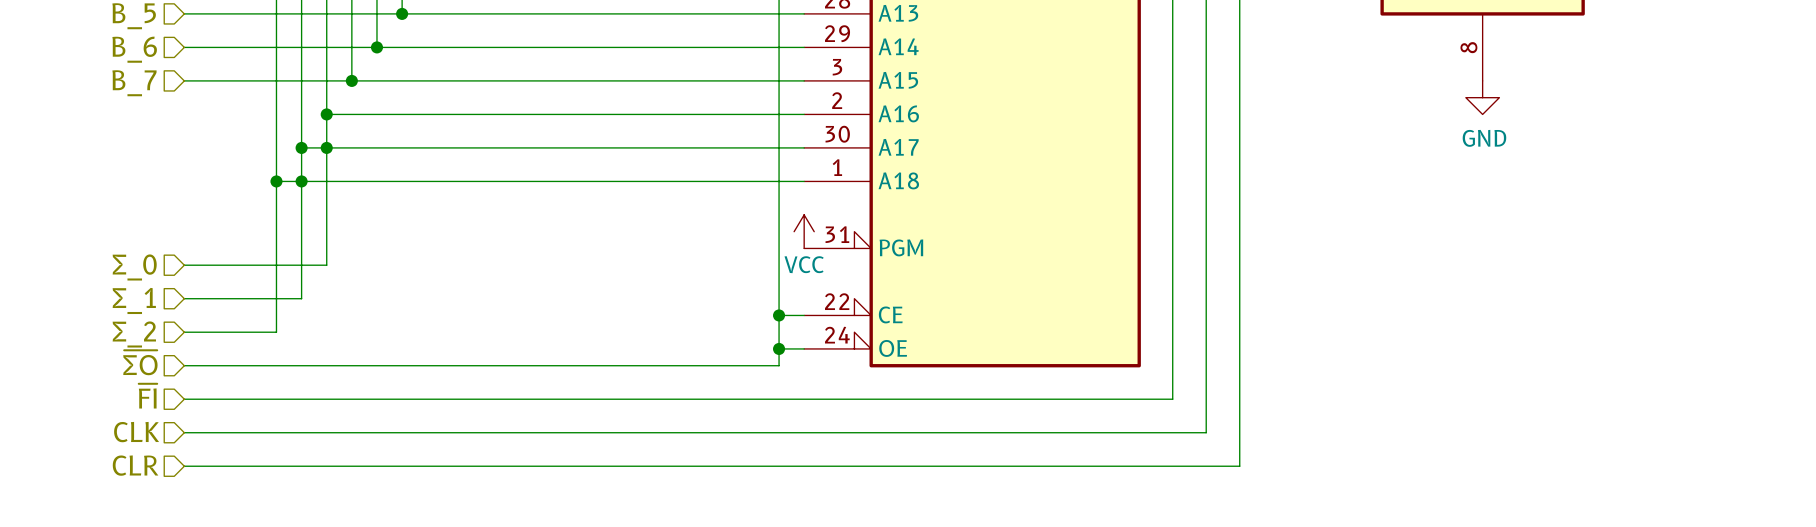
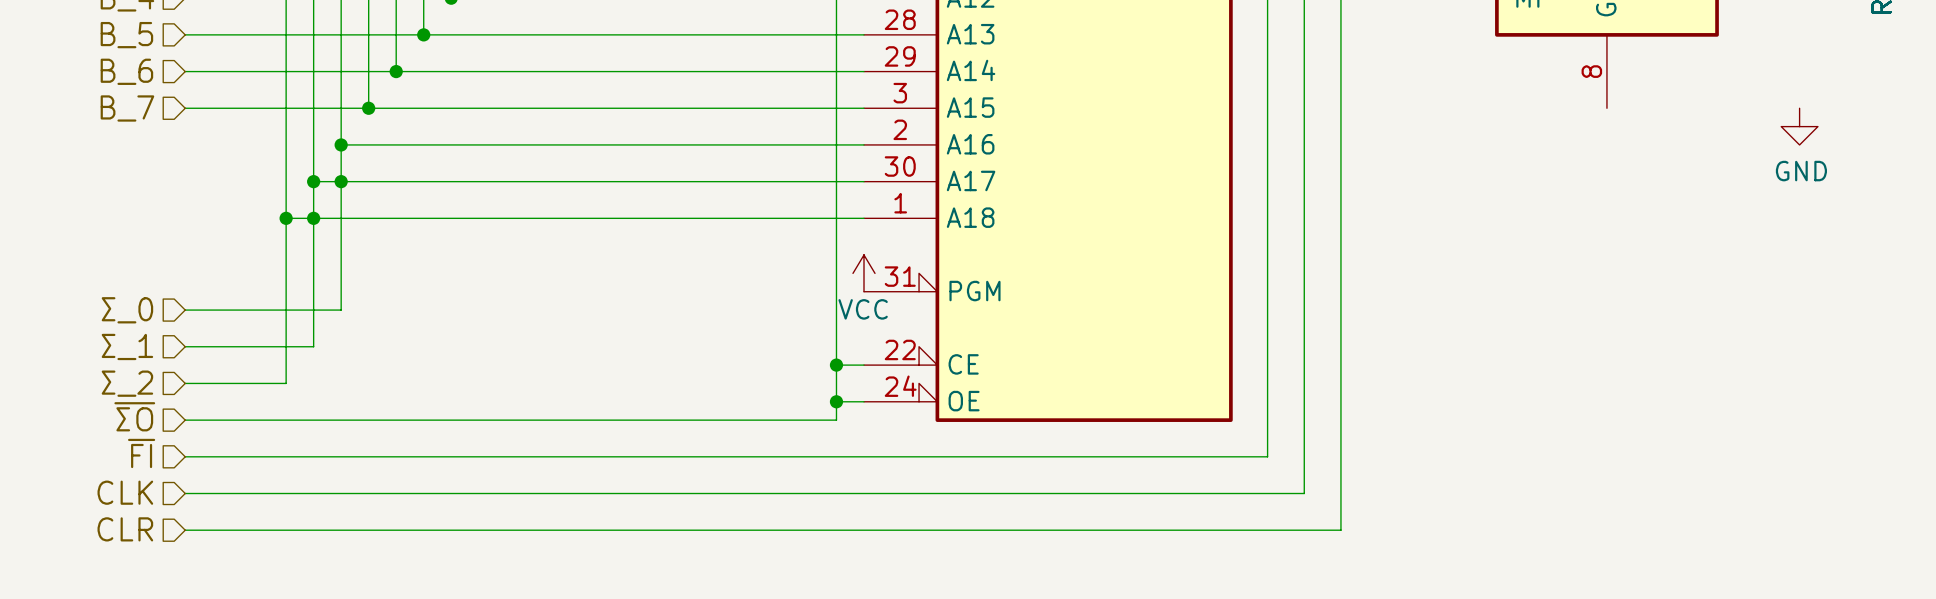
power symbol: GND (1482, 97) -> none
power symbol: none -> GND (1799, 126)

